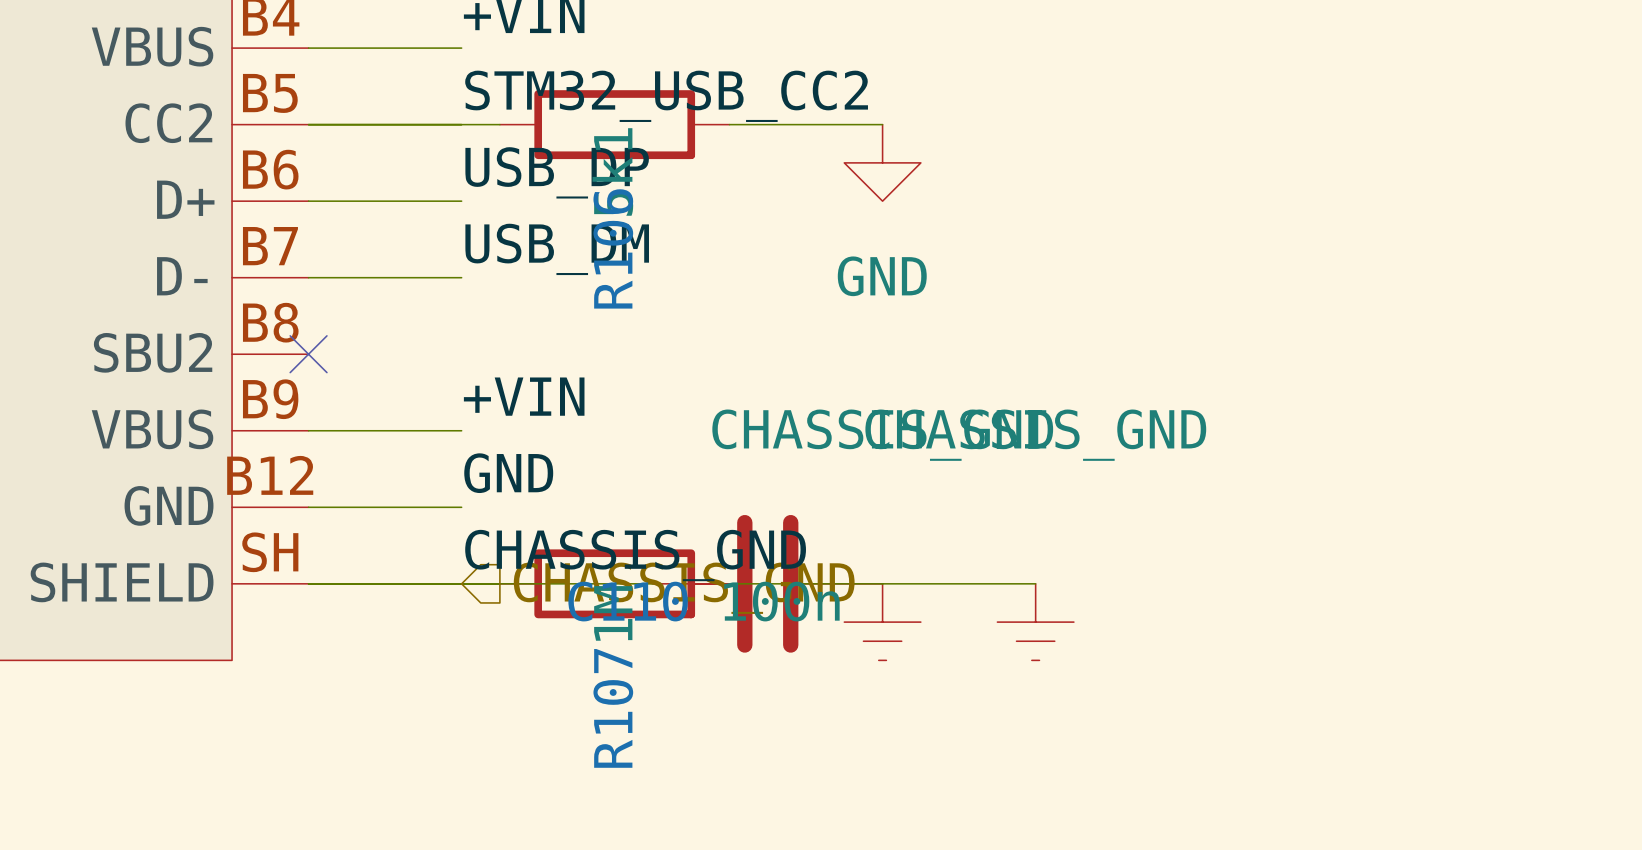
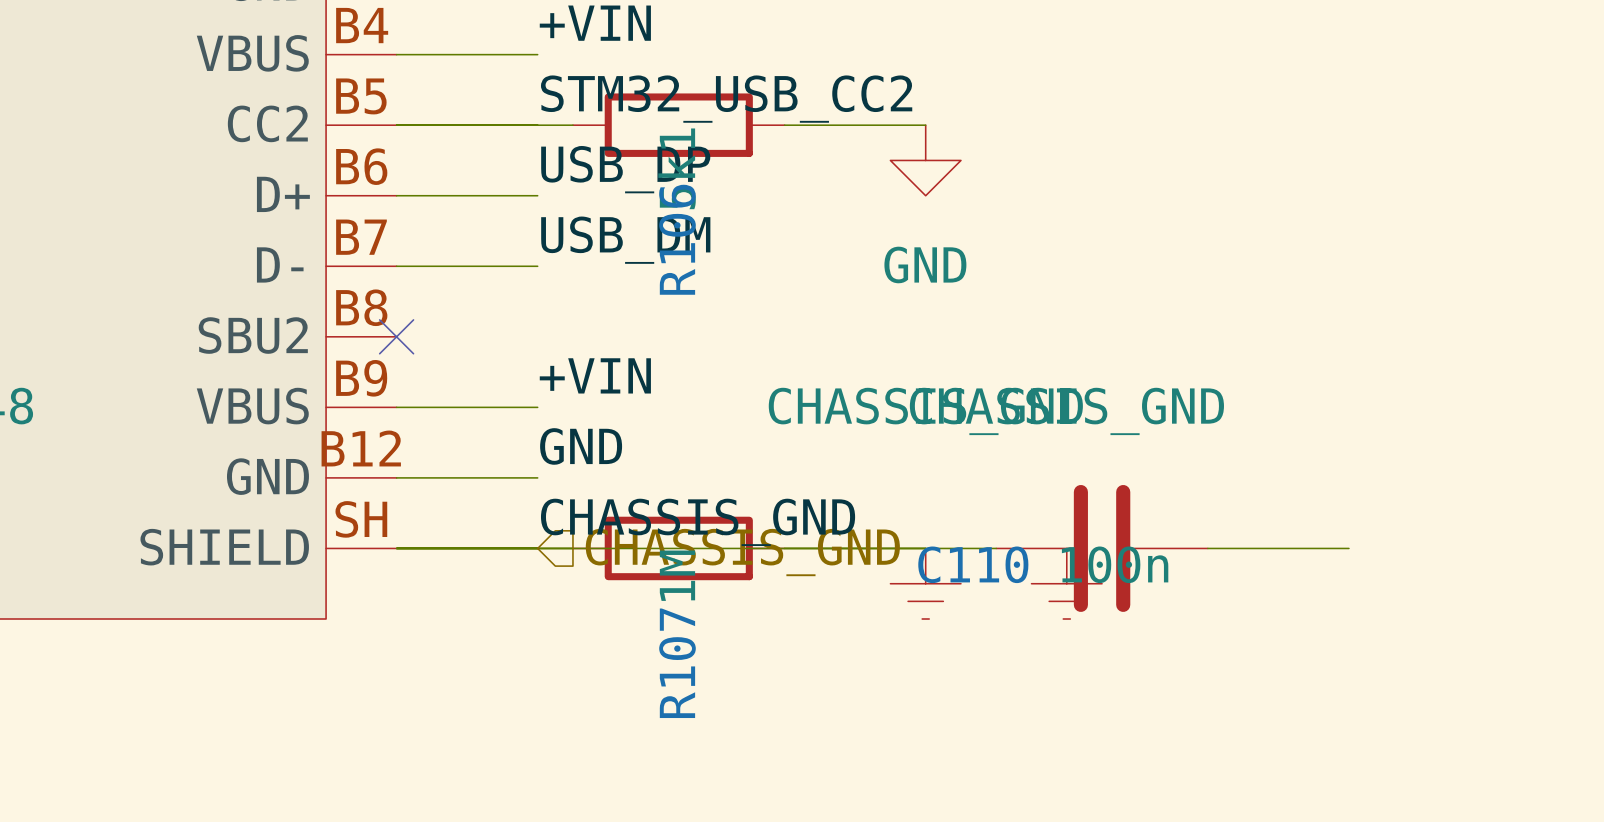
C110 position: (767, 583) -> (1102, 548)
wire: none -> (1207, 548) (1348, 548)

